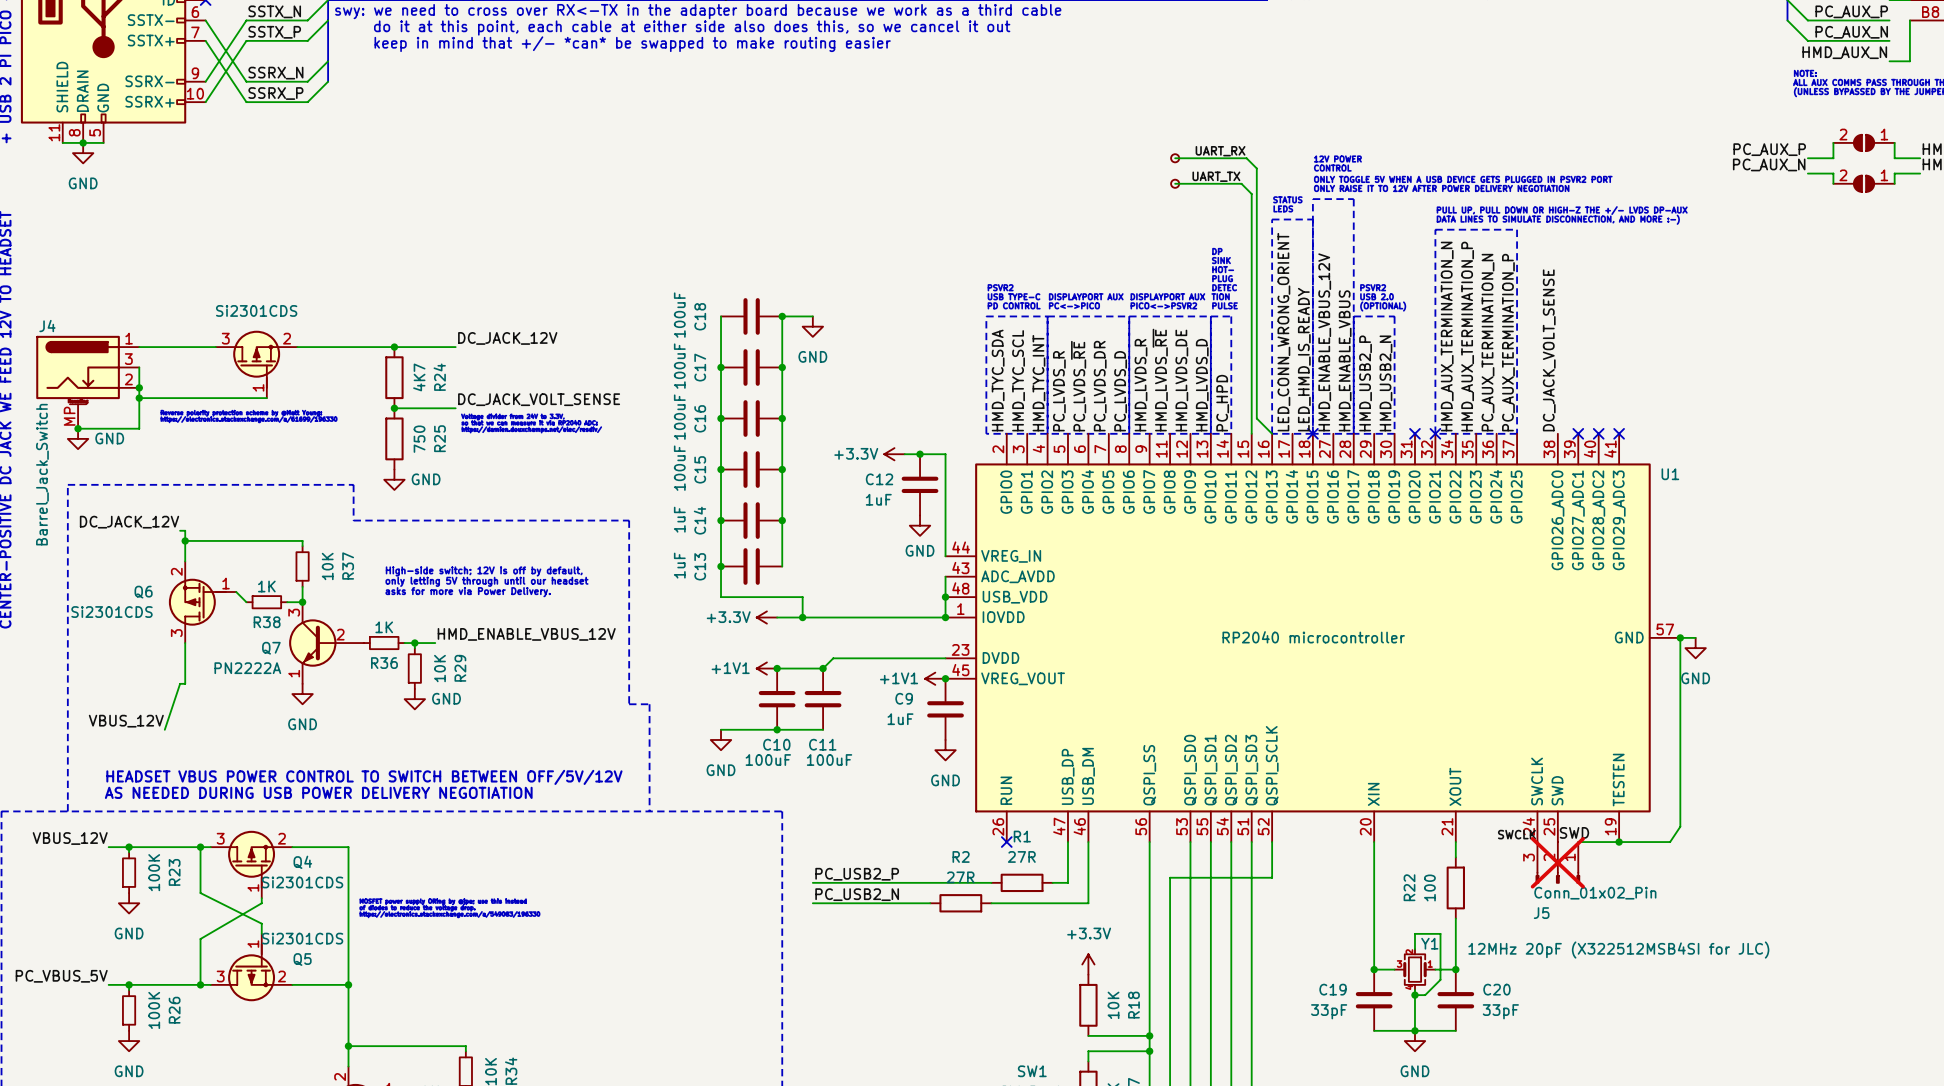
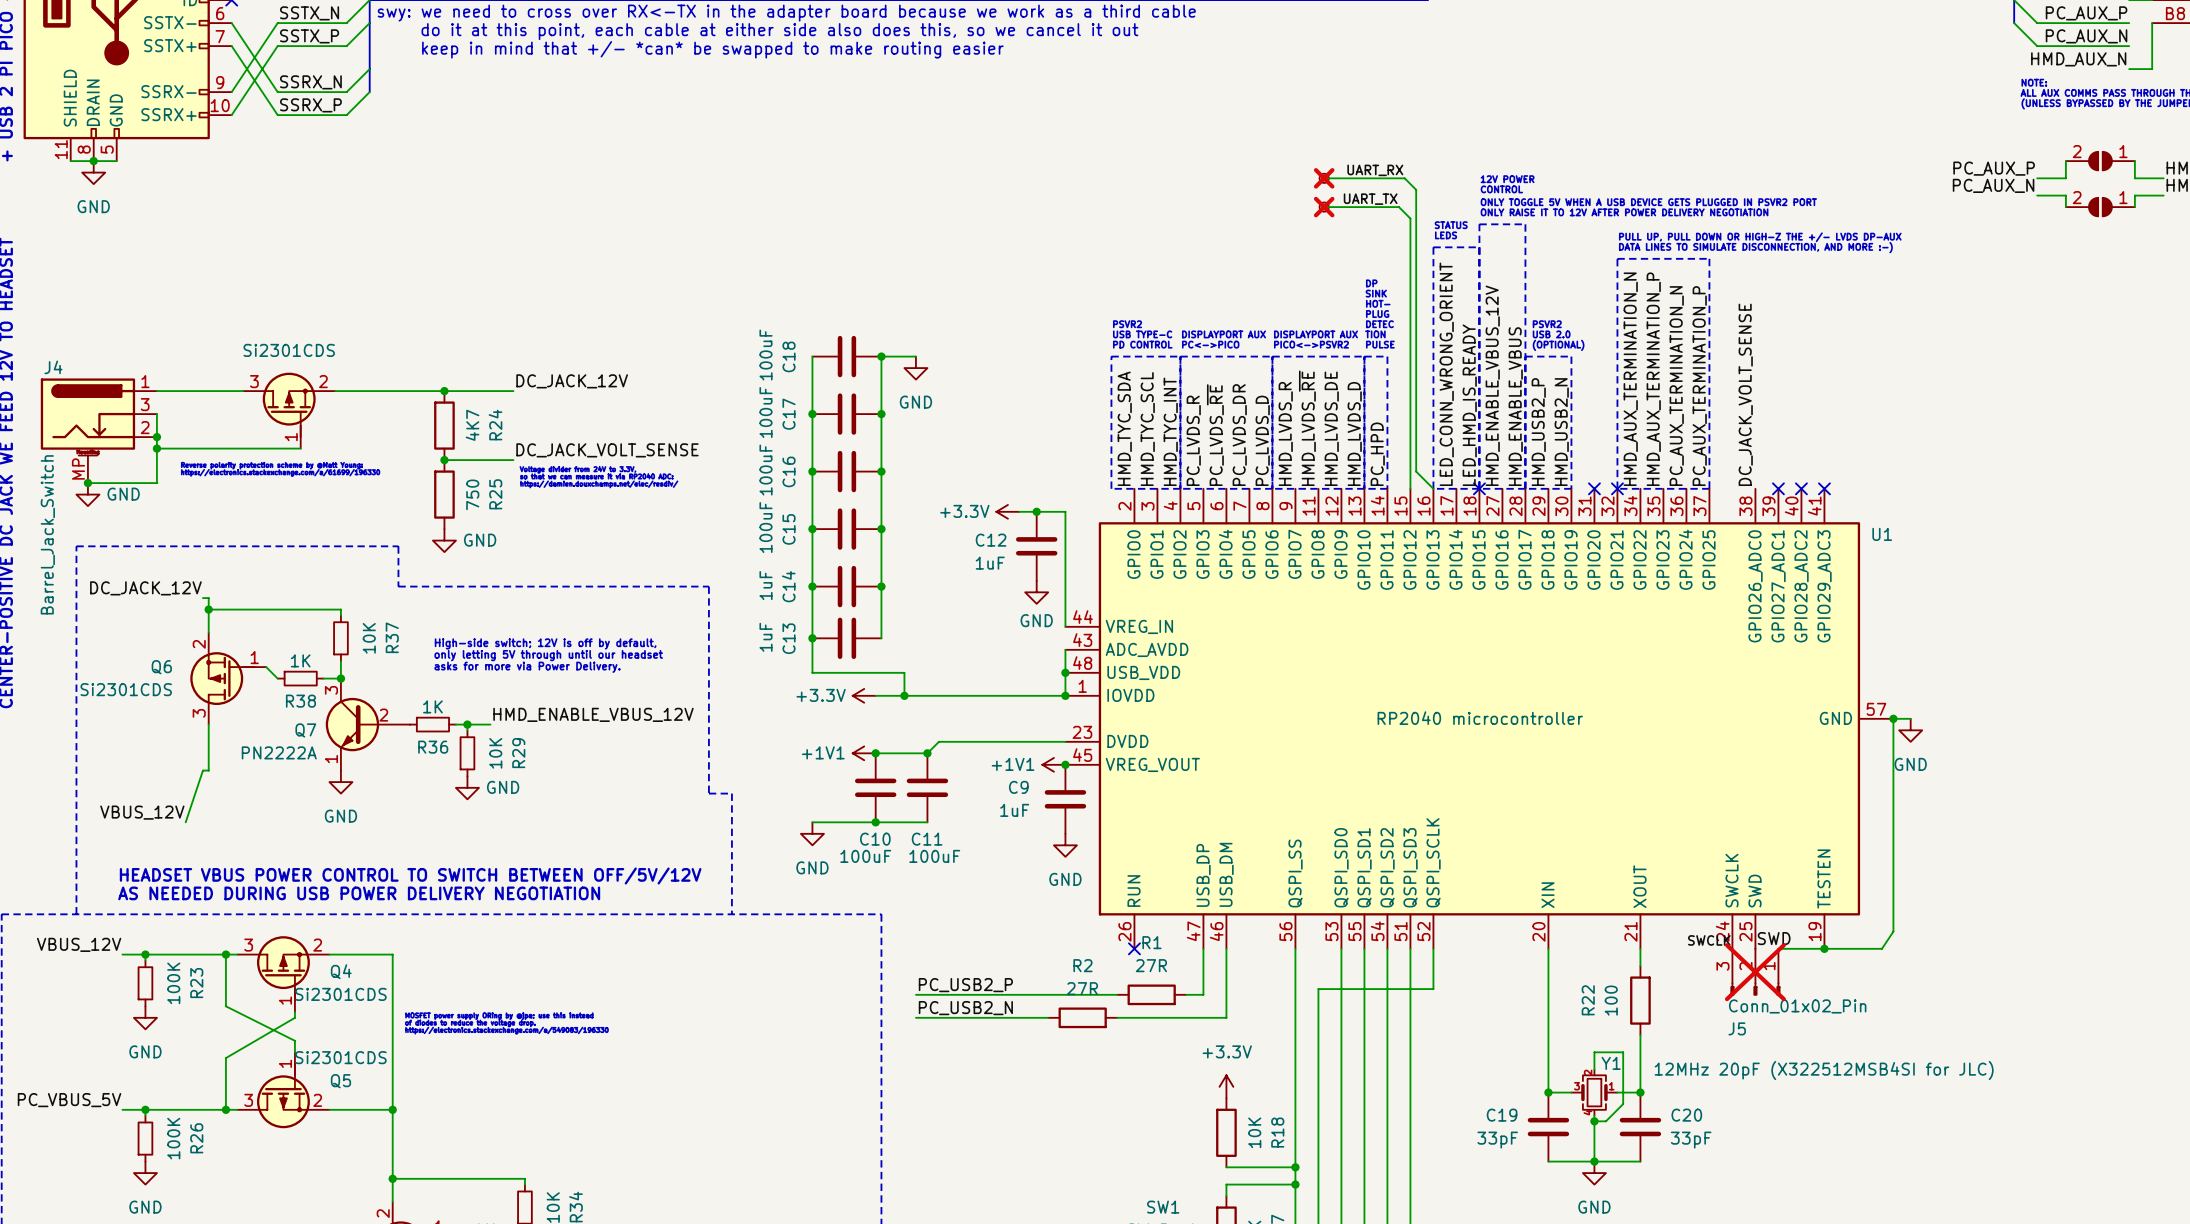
part do-not-place cross: none -> (1324, 178)
part do-not-place cross: none -> (1324, 207)

